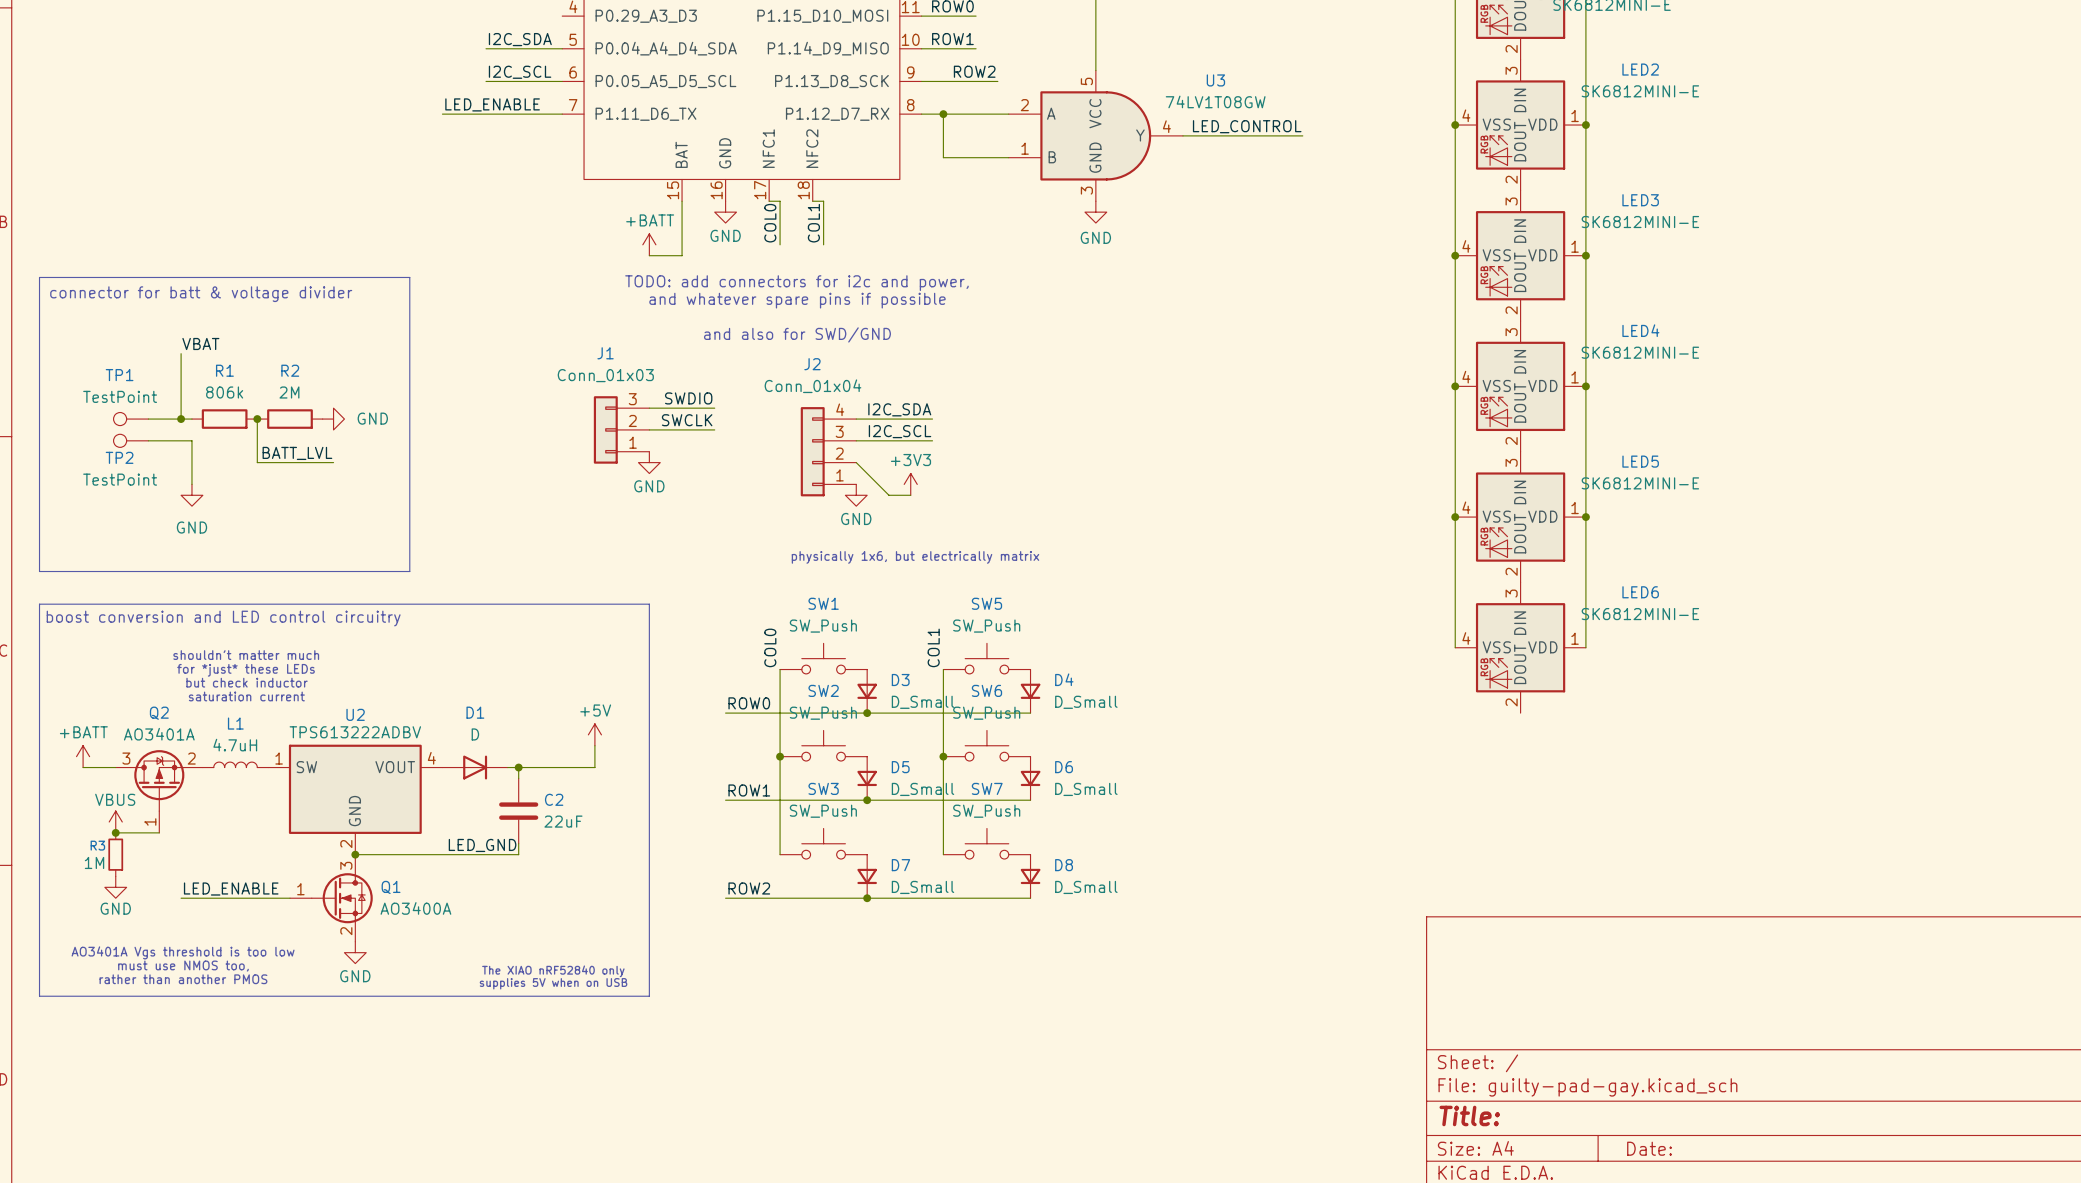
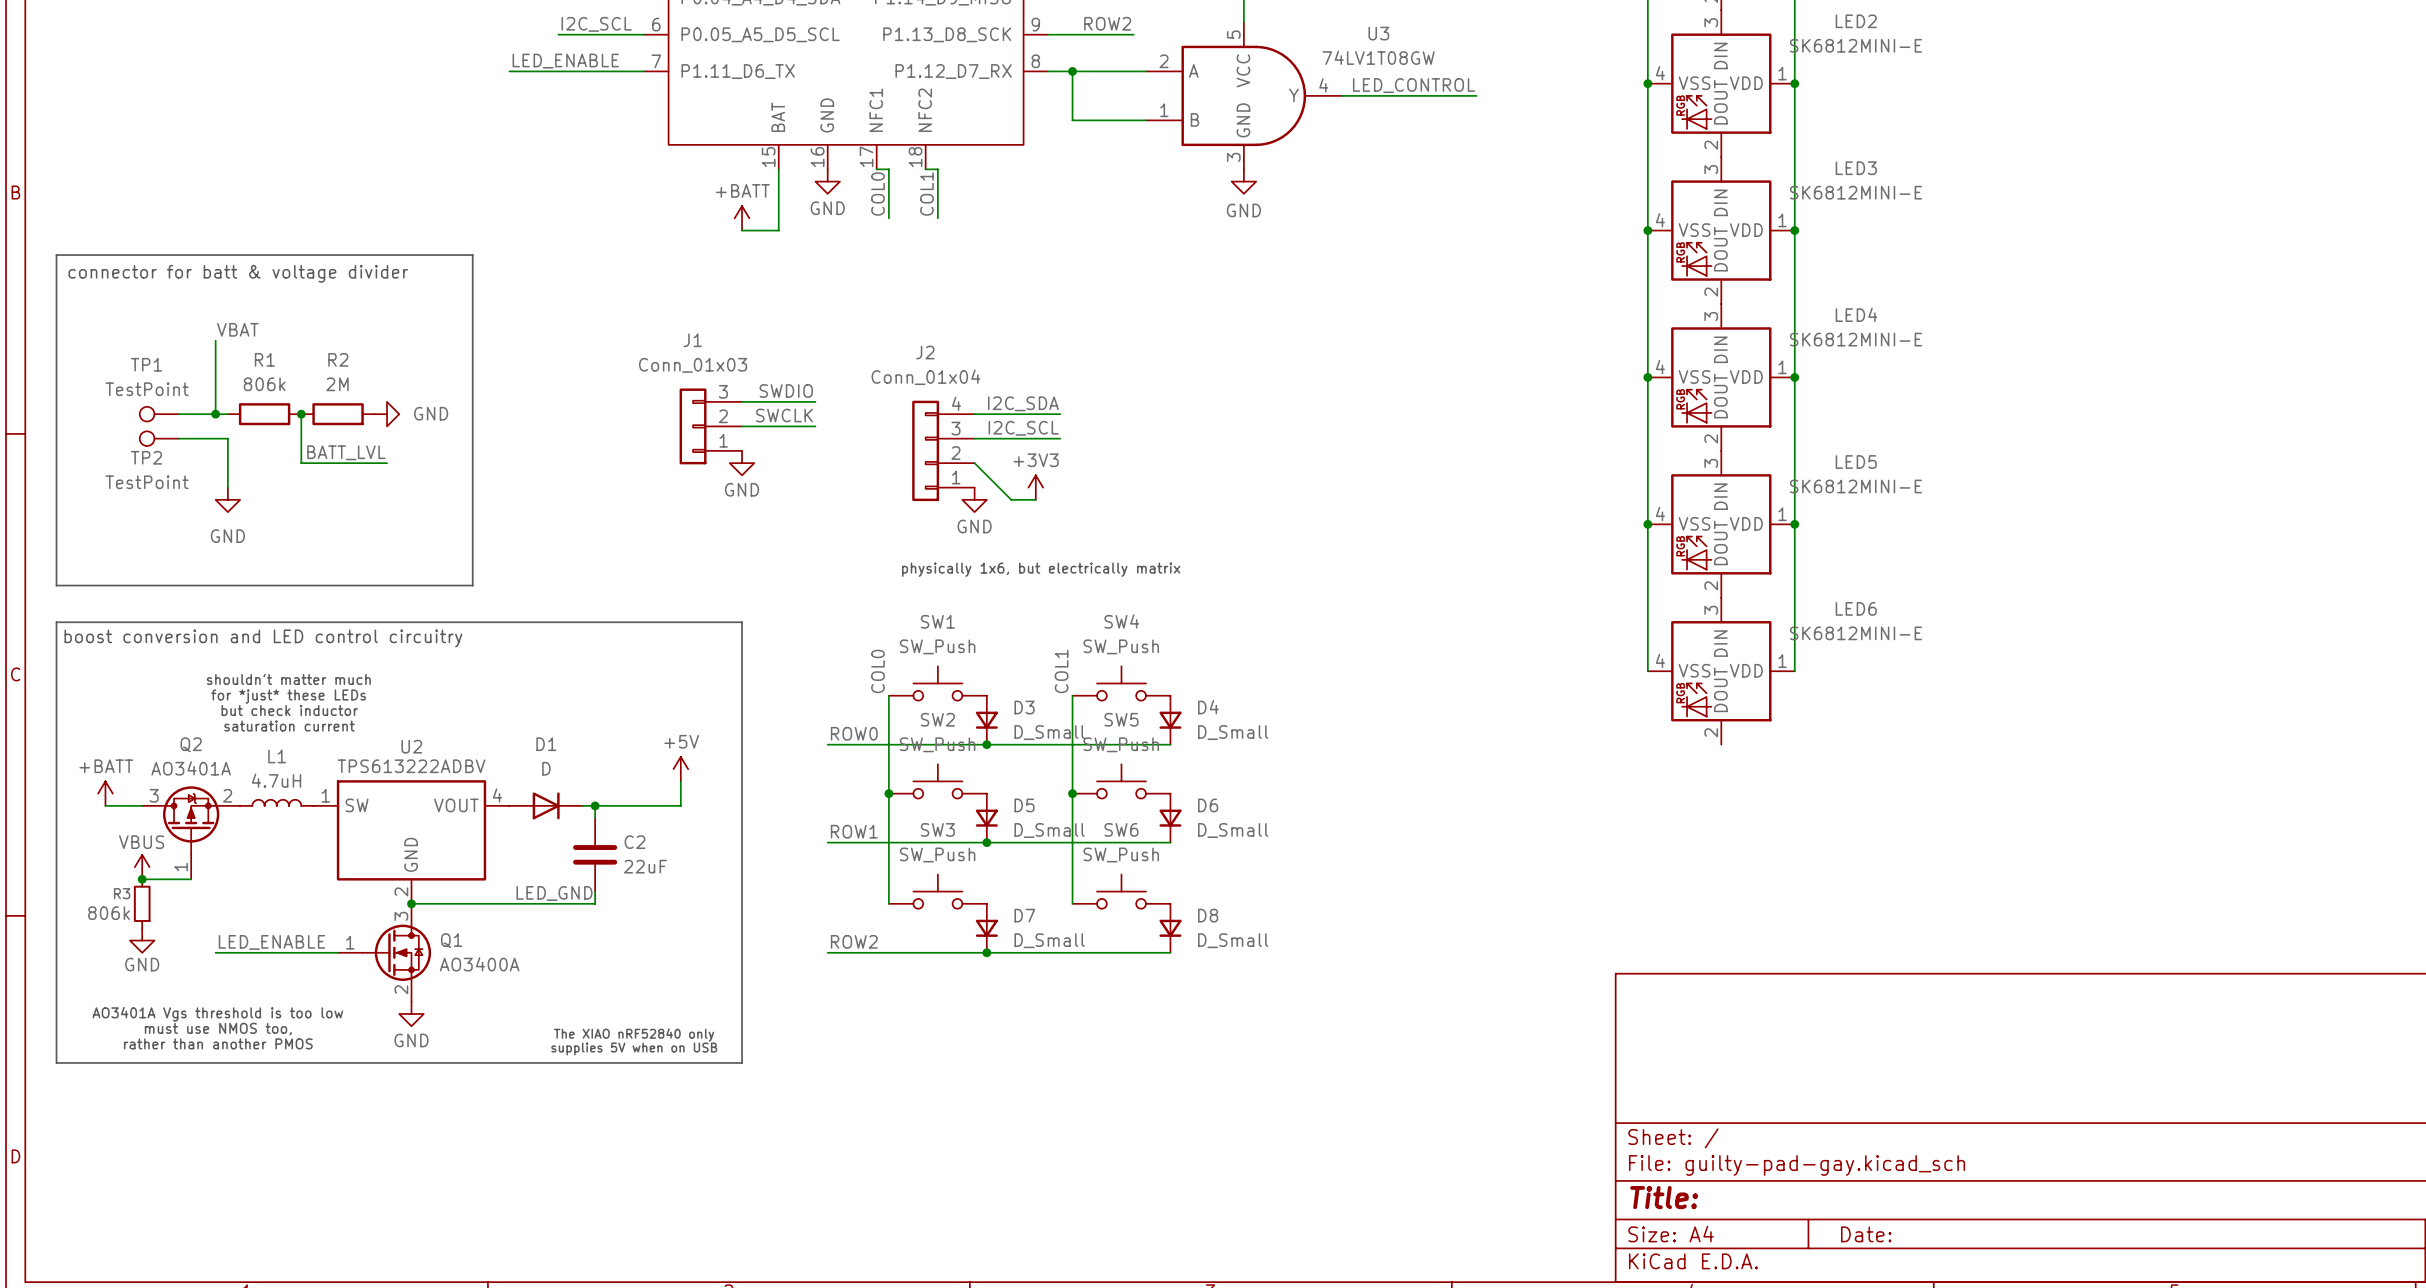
text: TODO: add connectors for i2c and power, (796, 283) -> none
text: and whatever spare pins if possible (797, 300) -> none
text: and also for SWD/GND (797, 334) -> none
SW5 name: SW5 (986, 603) -> SW4 (1121, 621)
SW6 name: SW6 (986, 690) -> SW5 (1121, 719)
SW7 name: SW7 (987, 788) -> SW6 (1121, 829)
R3 value: 1M (94, 862) -> 806k (108, 913)

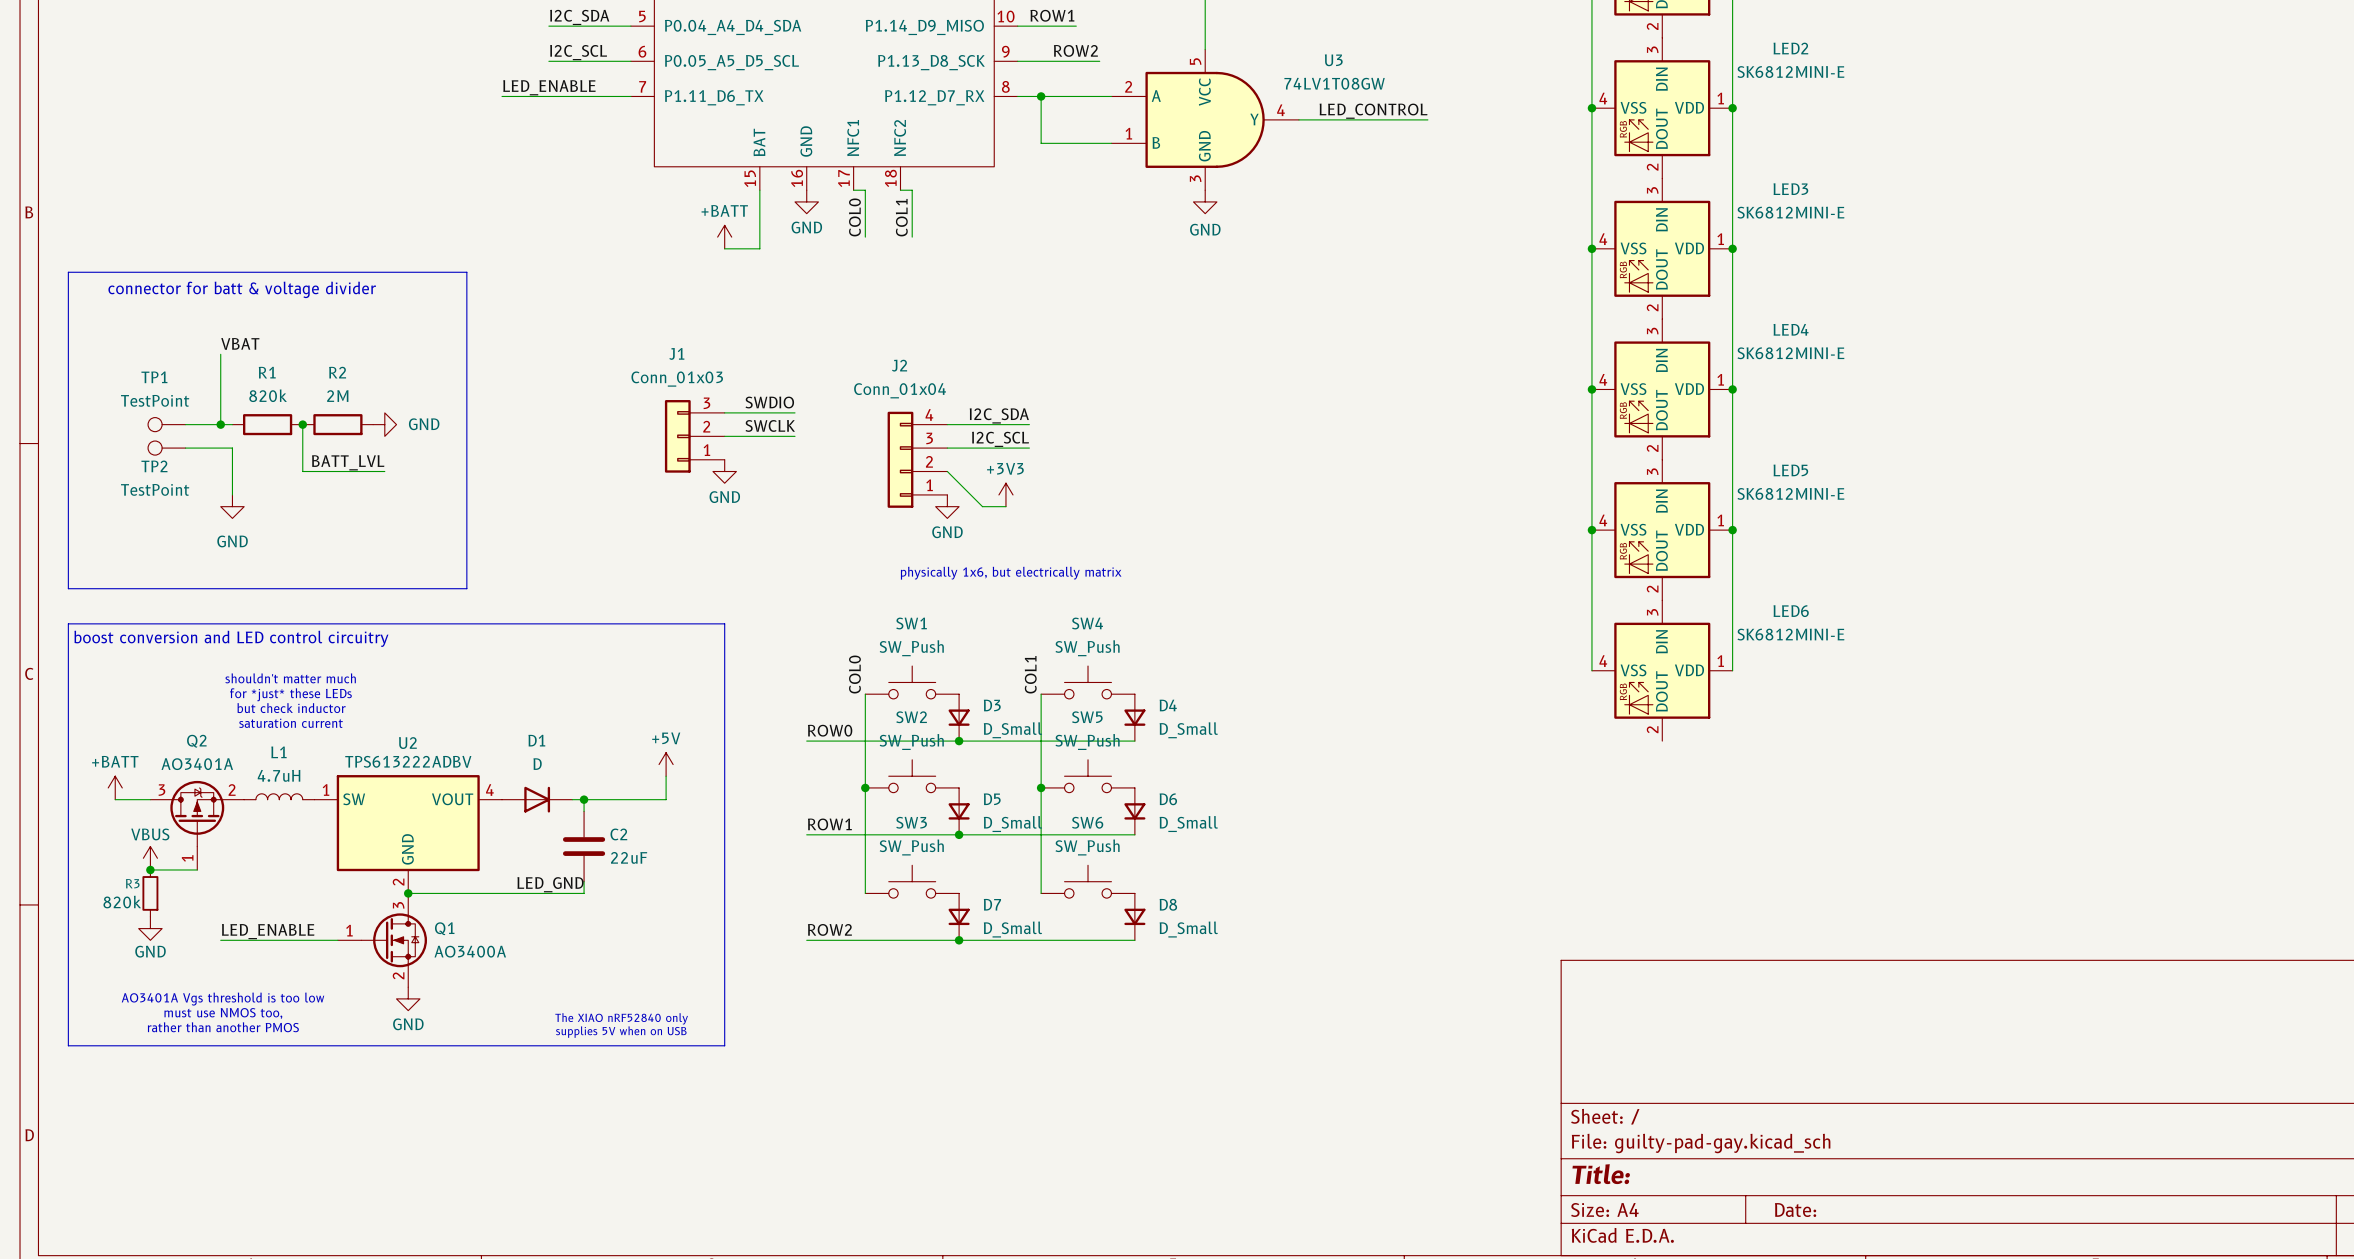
R1 value: 806k (264, 384) -> 820k (268, 395)
R3 value: 806k (108, 913) -> 820k (122, 902)

